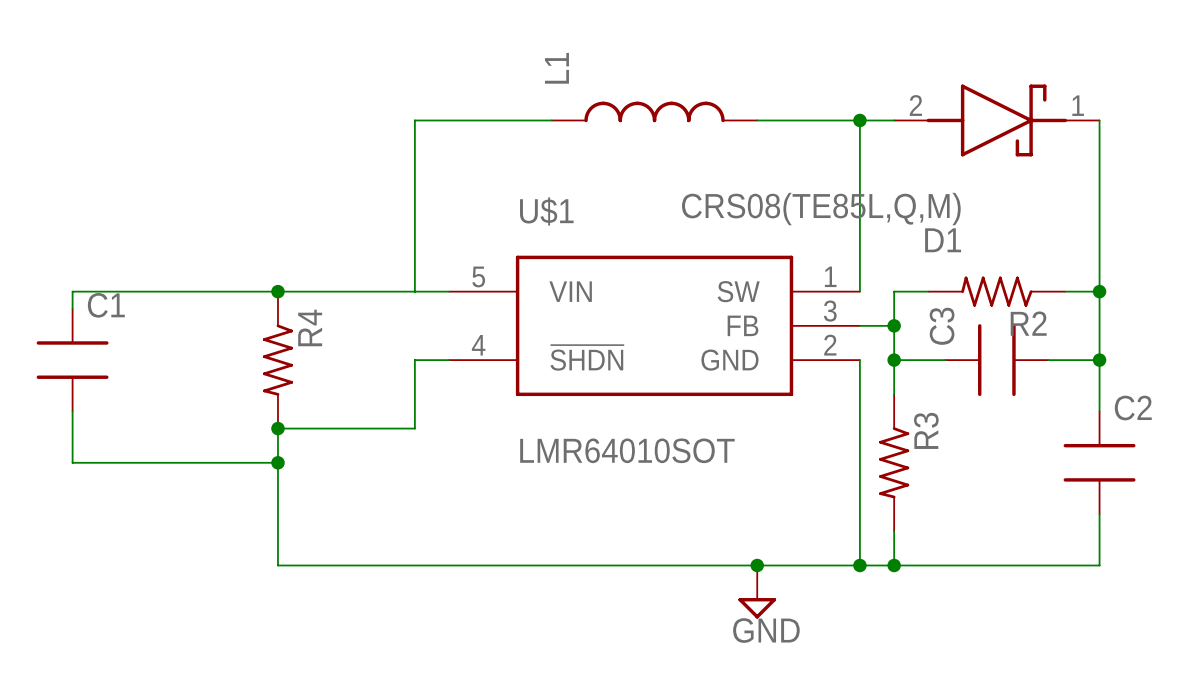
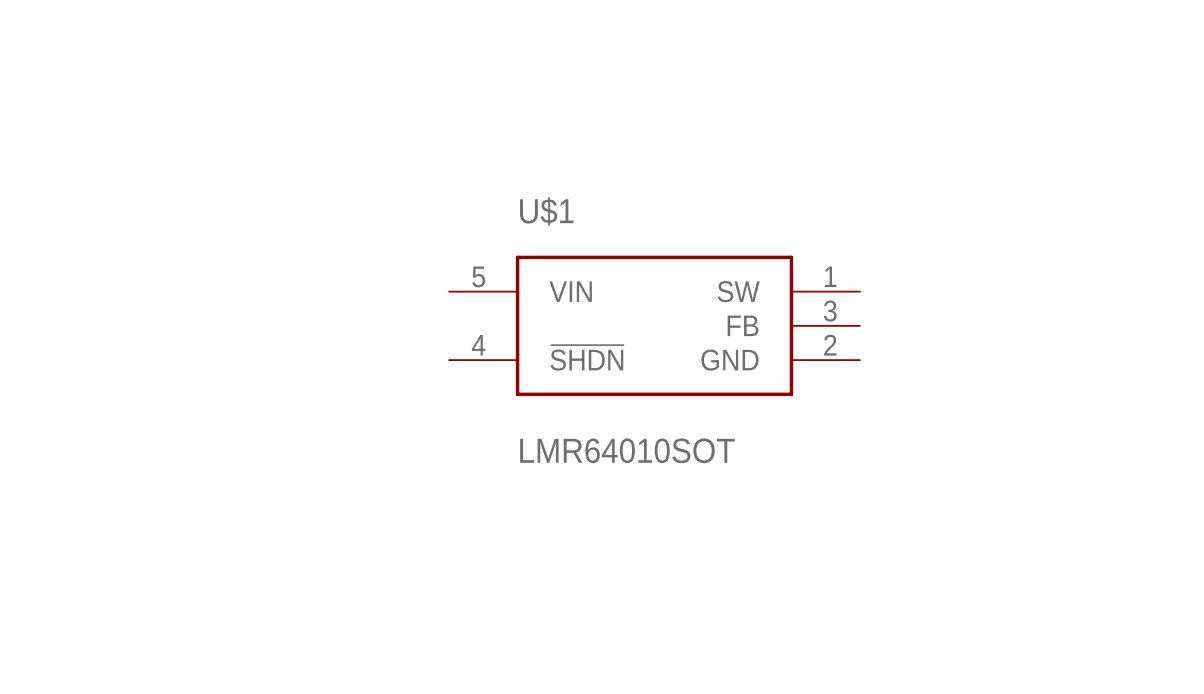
L1: (654, 111) -> none
wire: (551, 120) (414, 120) (414, 291) -> none
wire: (757, 120) (894, 120) -> none
wire: (859, 120) (859, 291) -> none
junction: (859, 120) -> none
D1: CRS08(TE85L,Q,M) (996, 120) -> none
wire: (1099, 120) (1099, 411) -> none
junction: (277, 291) -> none
wire: (449, 291) (72, 291) (72, 308) -> none
wire: (928, 291) (894, 291) (894, 394) -> none
R2: (996, 291) -> none
wire: (1065, 291) (1099, 291) -> none
junction: (1099, 291) -> none
wire: (859, 325) (894, 325) -> none
junction: (894, 325) -> none
C1: (72, 360) -> none
R4: (277, 360) -> none
wire: (449, 360) (414, 360) (414, 428) (277, 428) (277, 565) (1099, 565) (1099, 514) -> none
wire: (859, 360) (859, 565) -> none
wire: (894, 360) (945, 360) -> none
junction: (894, 360) -> none
C3: (996, 360) -> none
wire: (1048, 360) (1099, 360) -> none
junction: (1099, 360) -> none
wire: (72, 411) (72, 462) (277, 462) -> none
junction: (277, 428) -> none
junction: (277, 462) -> none
R3: (894, 462) -> none
C2: (1099, 462) -> none
wire: (894, 531) (894, 565) -> none
junction: (757, 565) -> none
junction: (859, 565) -> none
junction: (894, 565) -> none
power symbol: GND (757, 592) -> none

